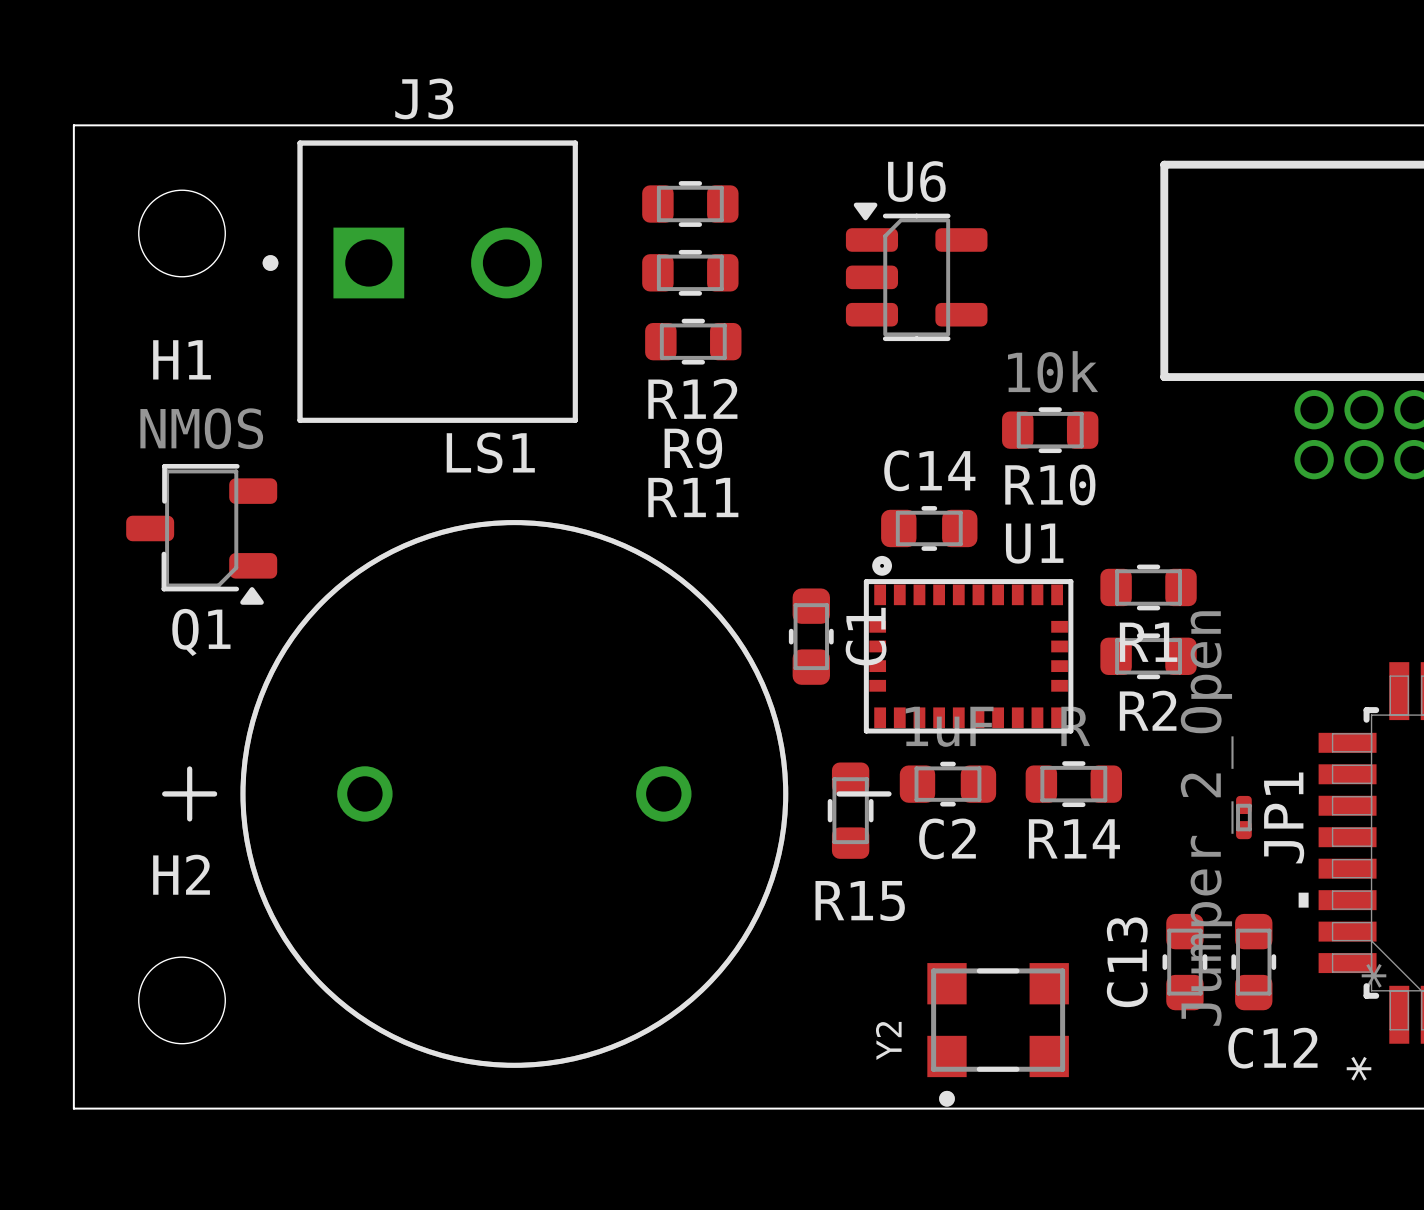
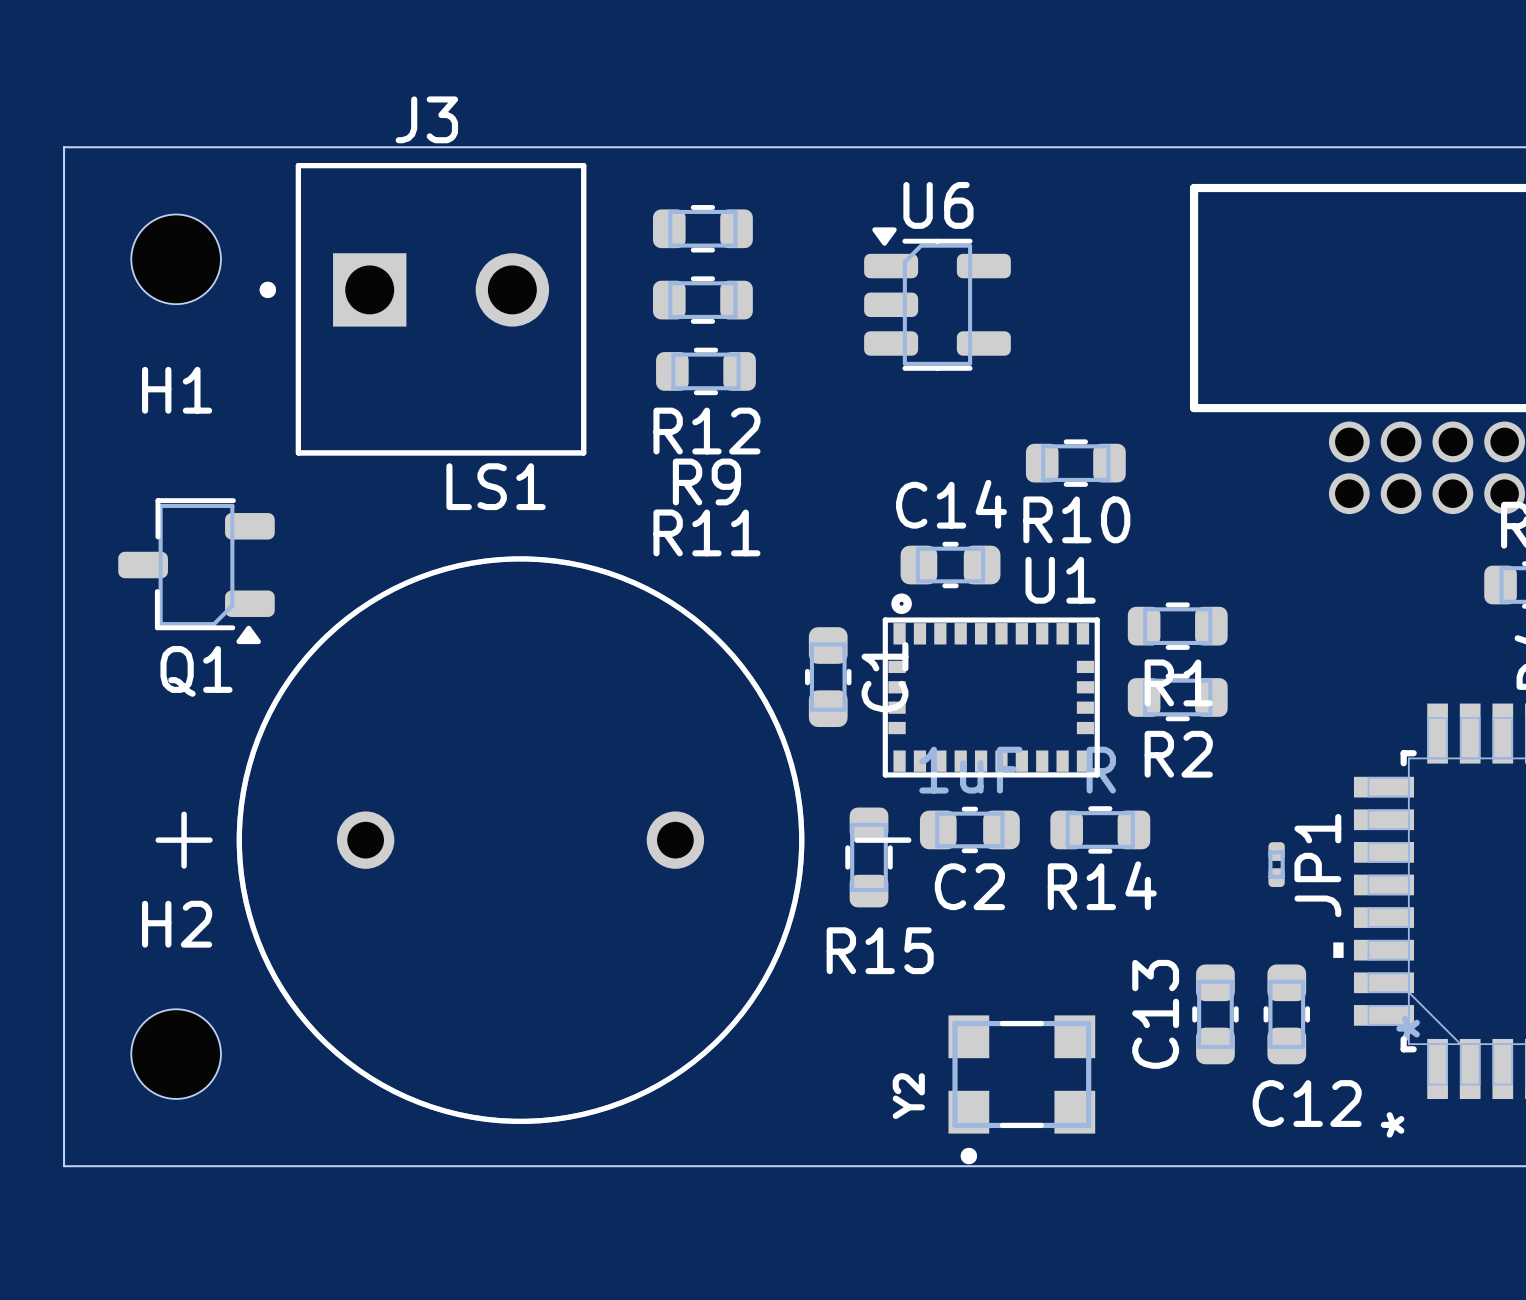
R10 value: 10k (1053, 371) -> none
Q1 value: NMOS (201, 428) -> none
JP1 value: Jumper_2_Open (1207, 818) -> none

